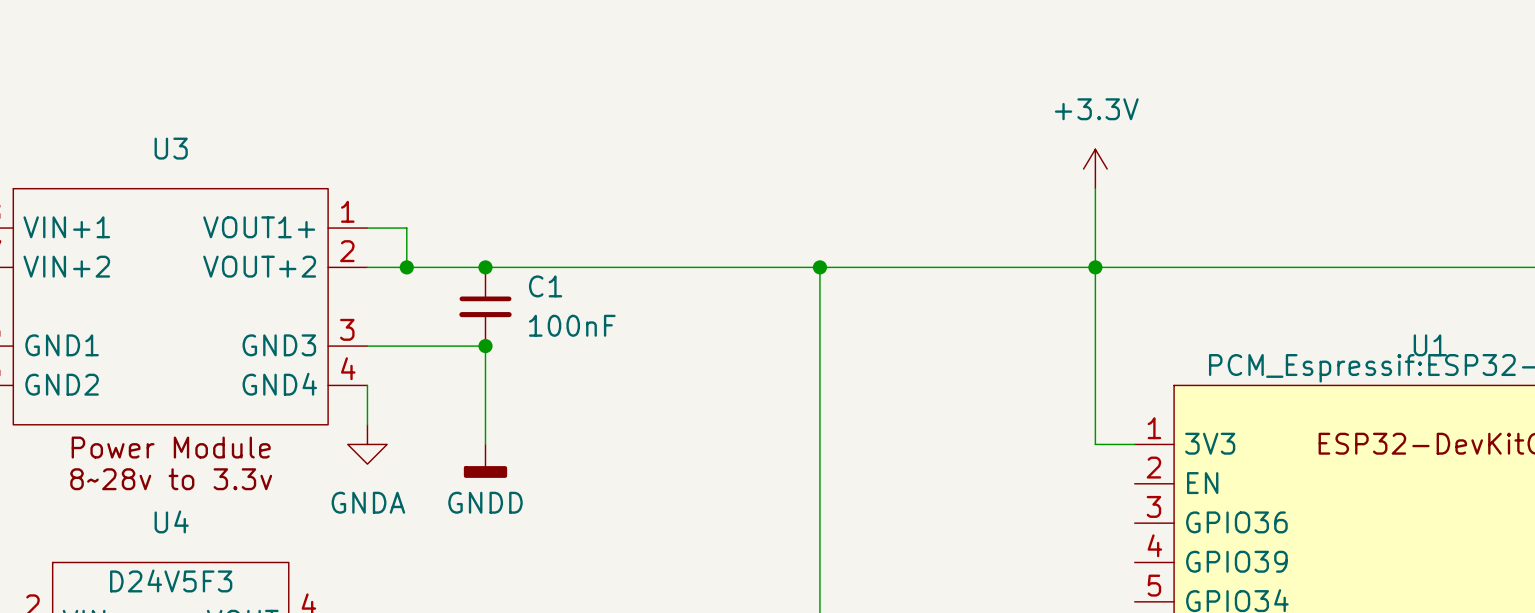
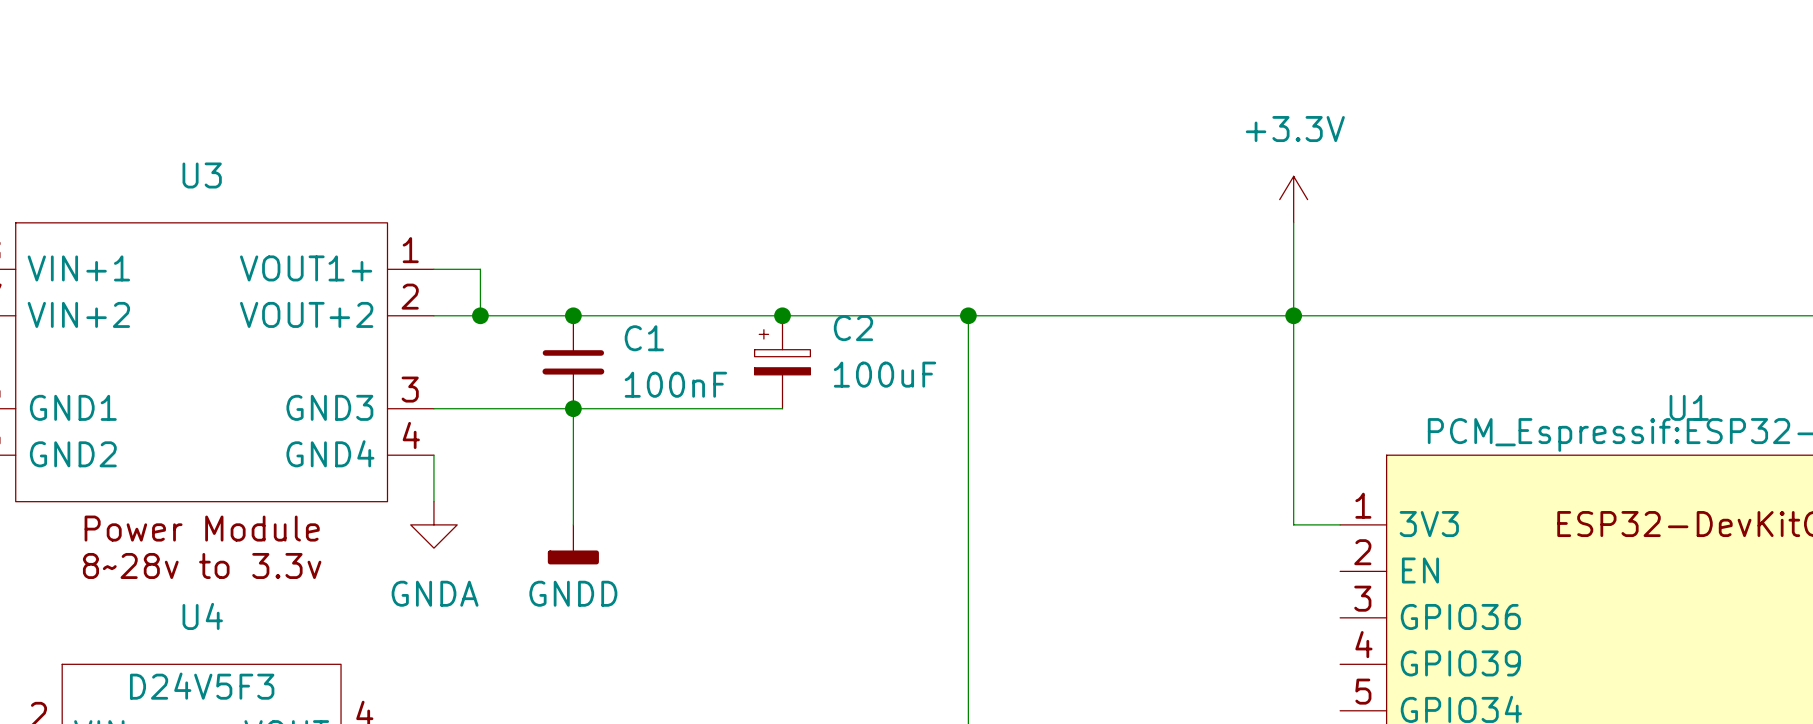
junction: none -> (782, 315)
C2: none -> 100uF (782, 362)
wire: none -> (573, 408) (782, 408)

